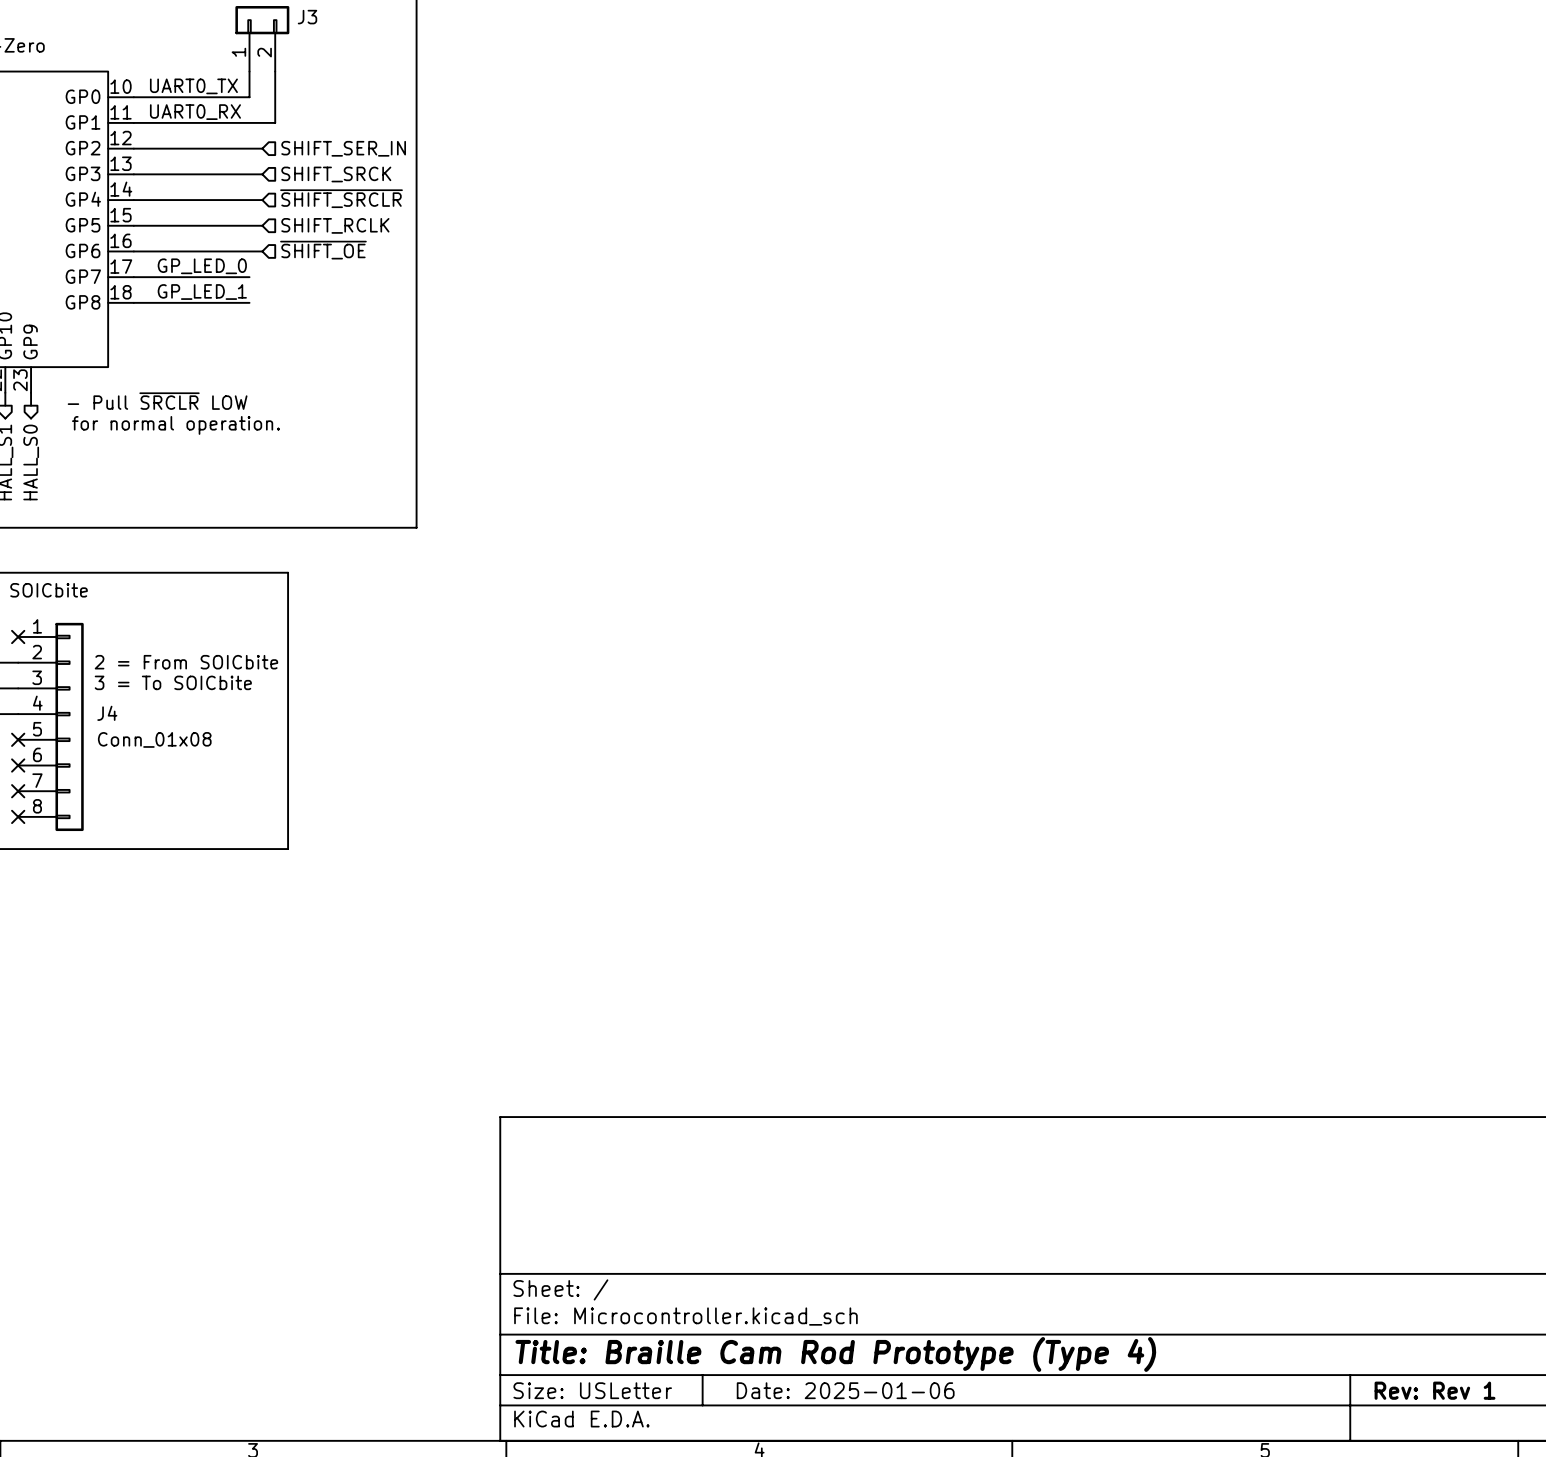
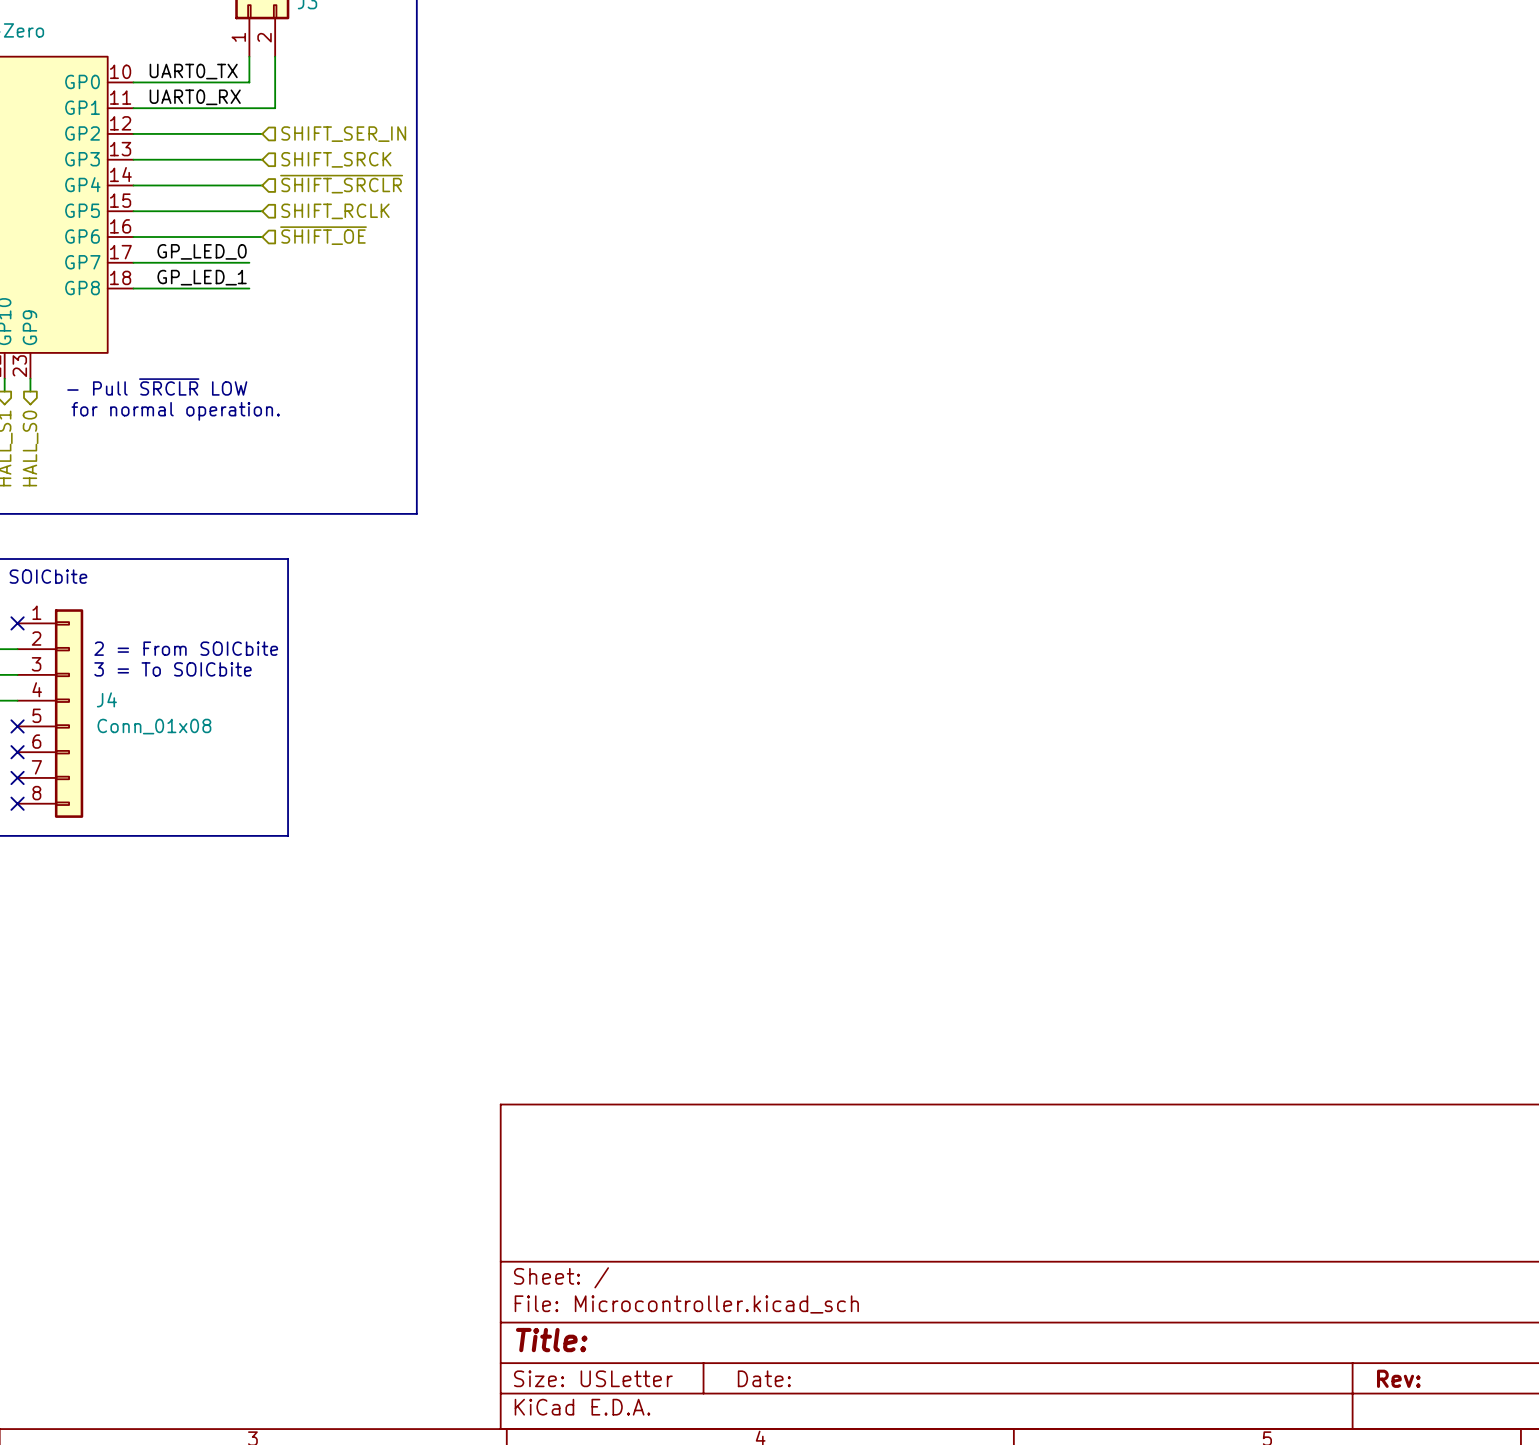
title block: Title: Braille Cam Rod Prototype (Type 4) (835, 1354) -> Title: (551, 1340)
title block: Date: 2025-01-06 (845, 1390) -> Date: (764, 1378)
title block: Rev: Rev 1 (1435, 1390) -> Rev: (1398, 1378)

